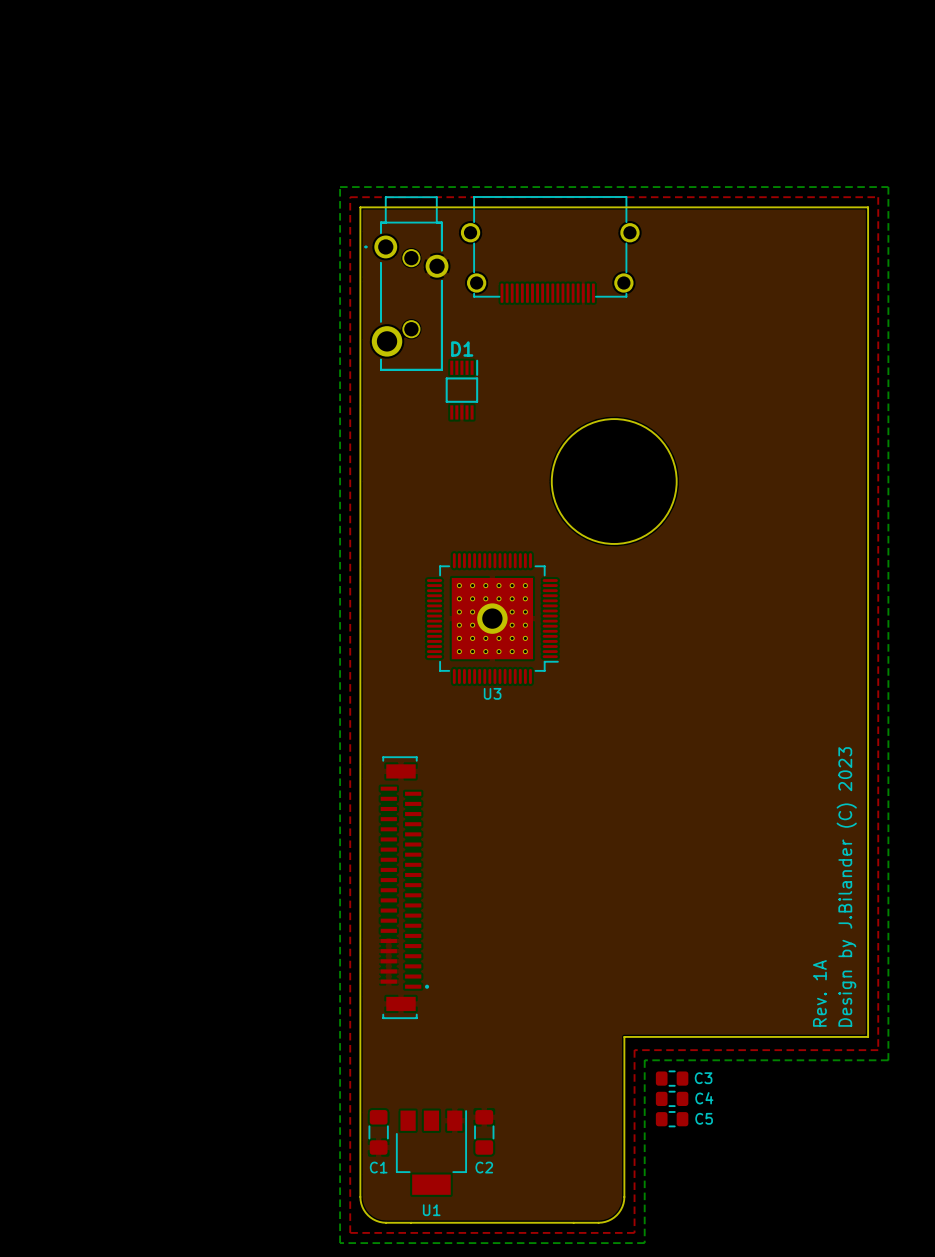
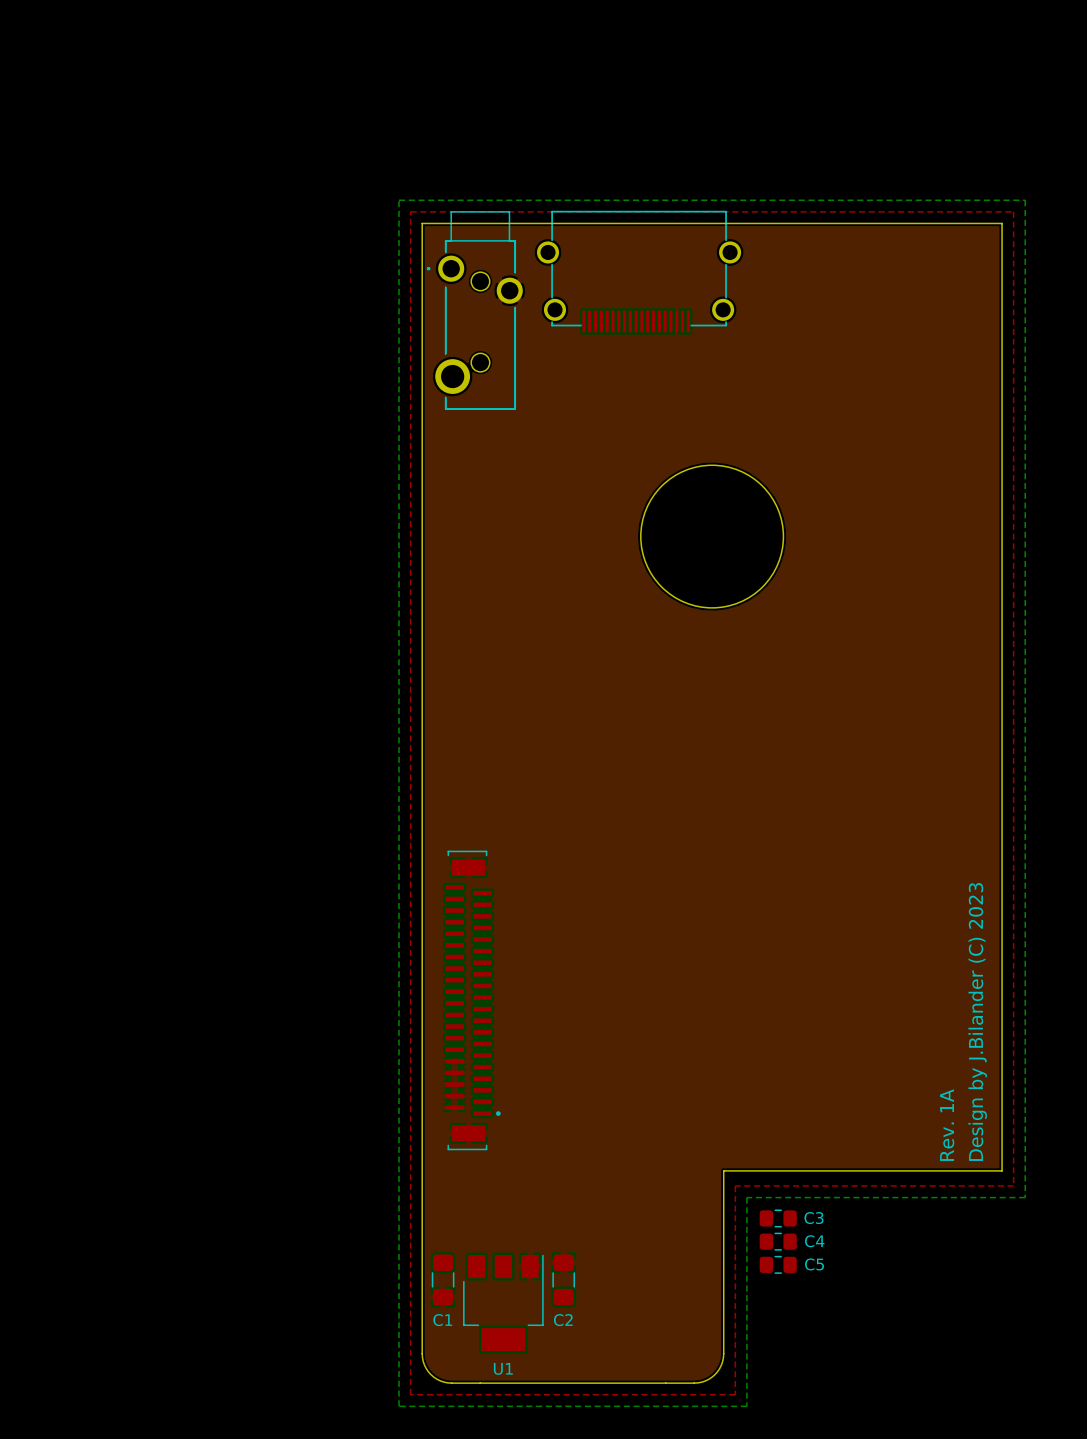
D1: (461, 389) -> none
U3: (492, 618) -> none

